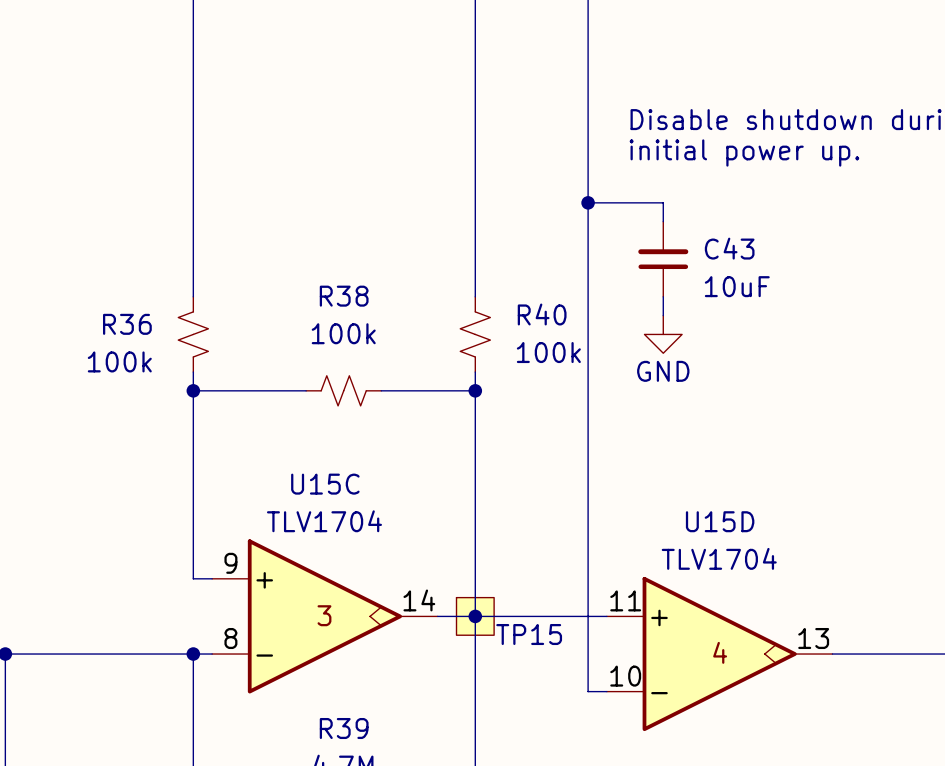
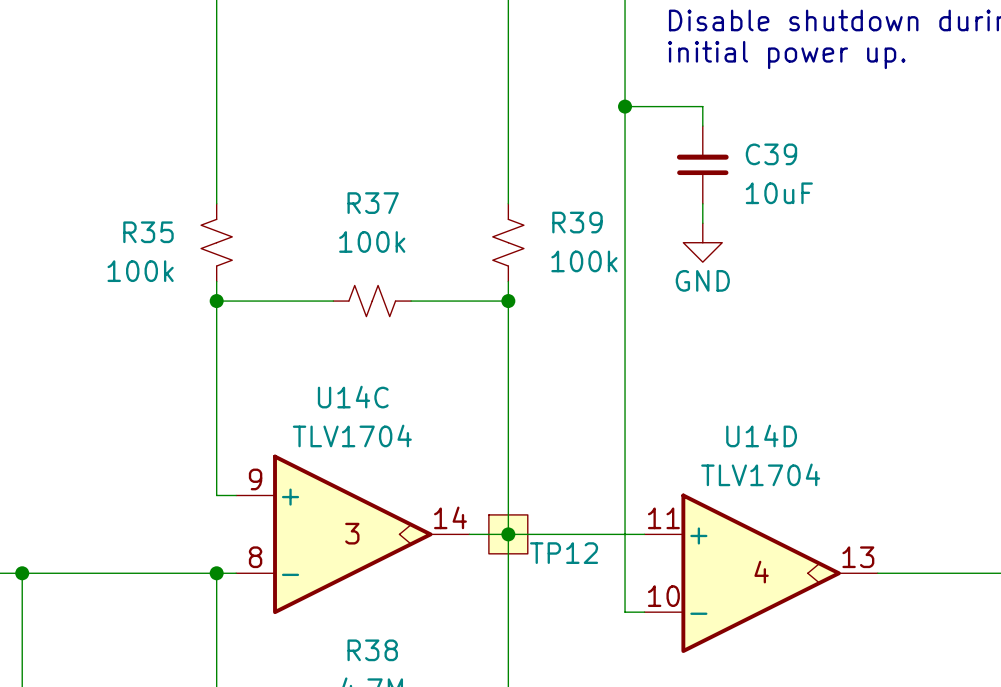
C43 name: C43 (729, 248) -> C39 (771, 154)
R38 name: R38 (344, 296) -> R37 (373, 203)
R40 name: R40 (542, 314) -> R39 (577, 222)
R36 name: R36 (127, 324) -> R35 (148, 232)
U15C name: U15C (325, 484) -> U14C (353, 397)
U15D name: U15D (720, 521) -> U14D (761, 435)
TP15 name: TP15 (529, 634) -> TP12 (564, 553)
R39 name: R39 (344, 728) -> R38 (372, 650)

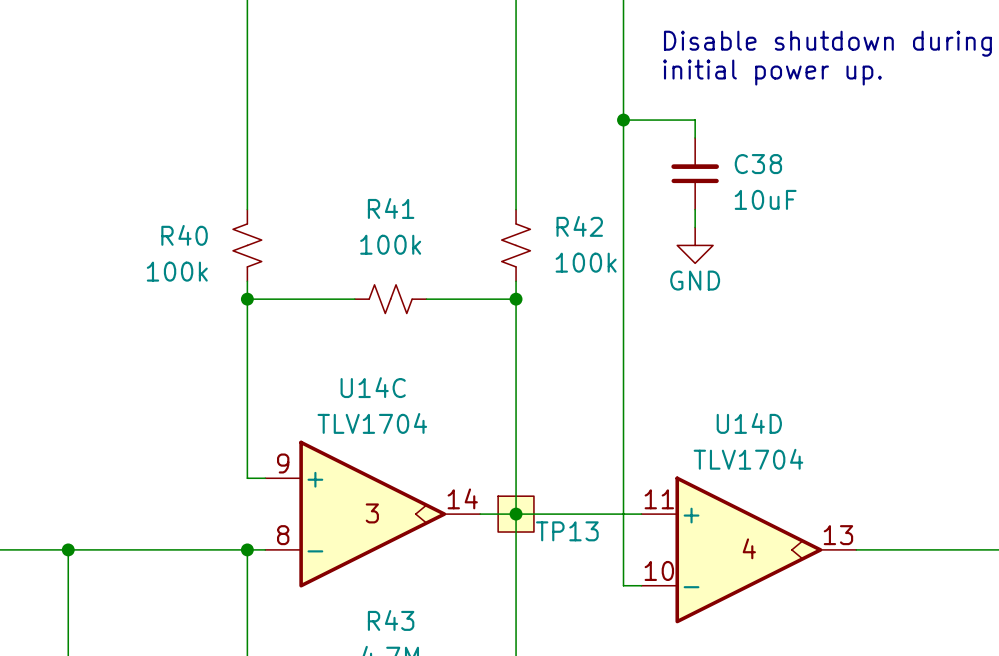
C39 name: C39 (771, 154) -> C38 (758, 164)
R37 name: R37 (373, 203) -> R41 (391, 208)
R39 name: R39 (577, 222) -> R42 (579, 226)
R35 name: R35 (148, 232) -> R40 (184, 235)
TP12 name: TP12 (564, 553) -> TP13 (567, 531)
R38 name: R38 (372, 650) -> R43 (391, 620)

